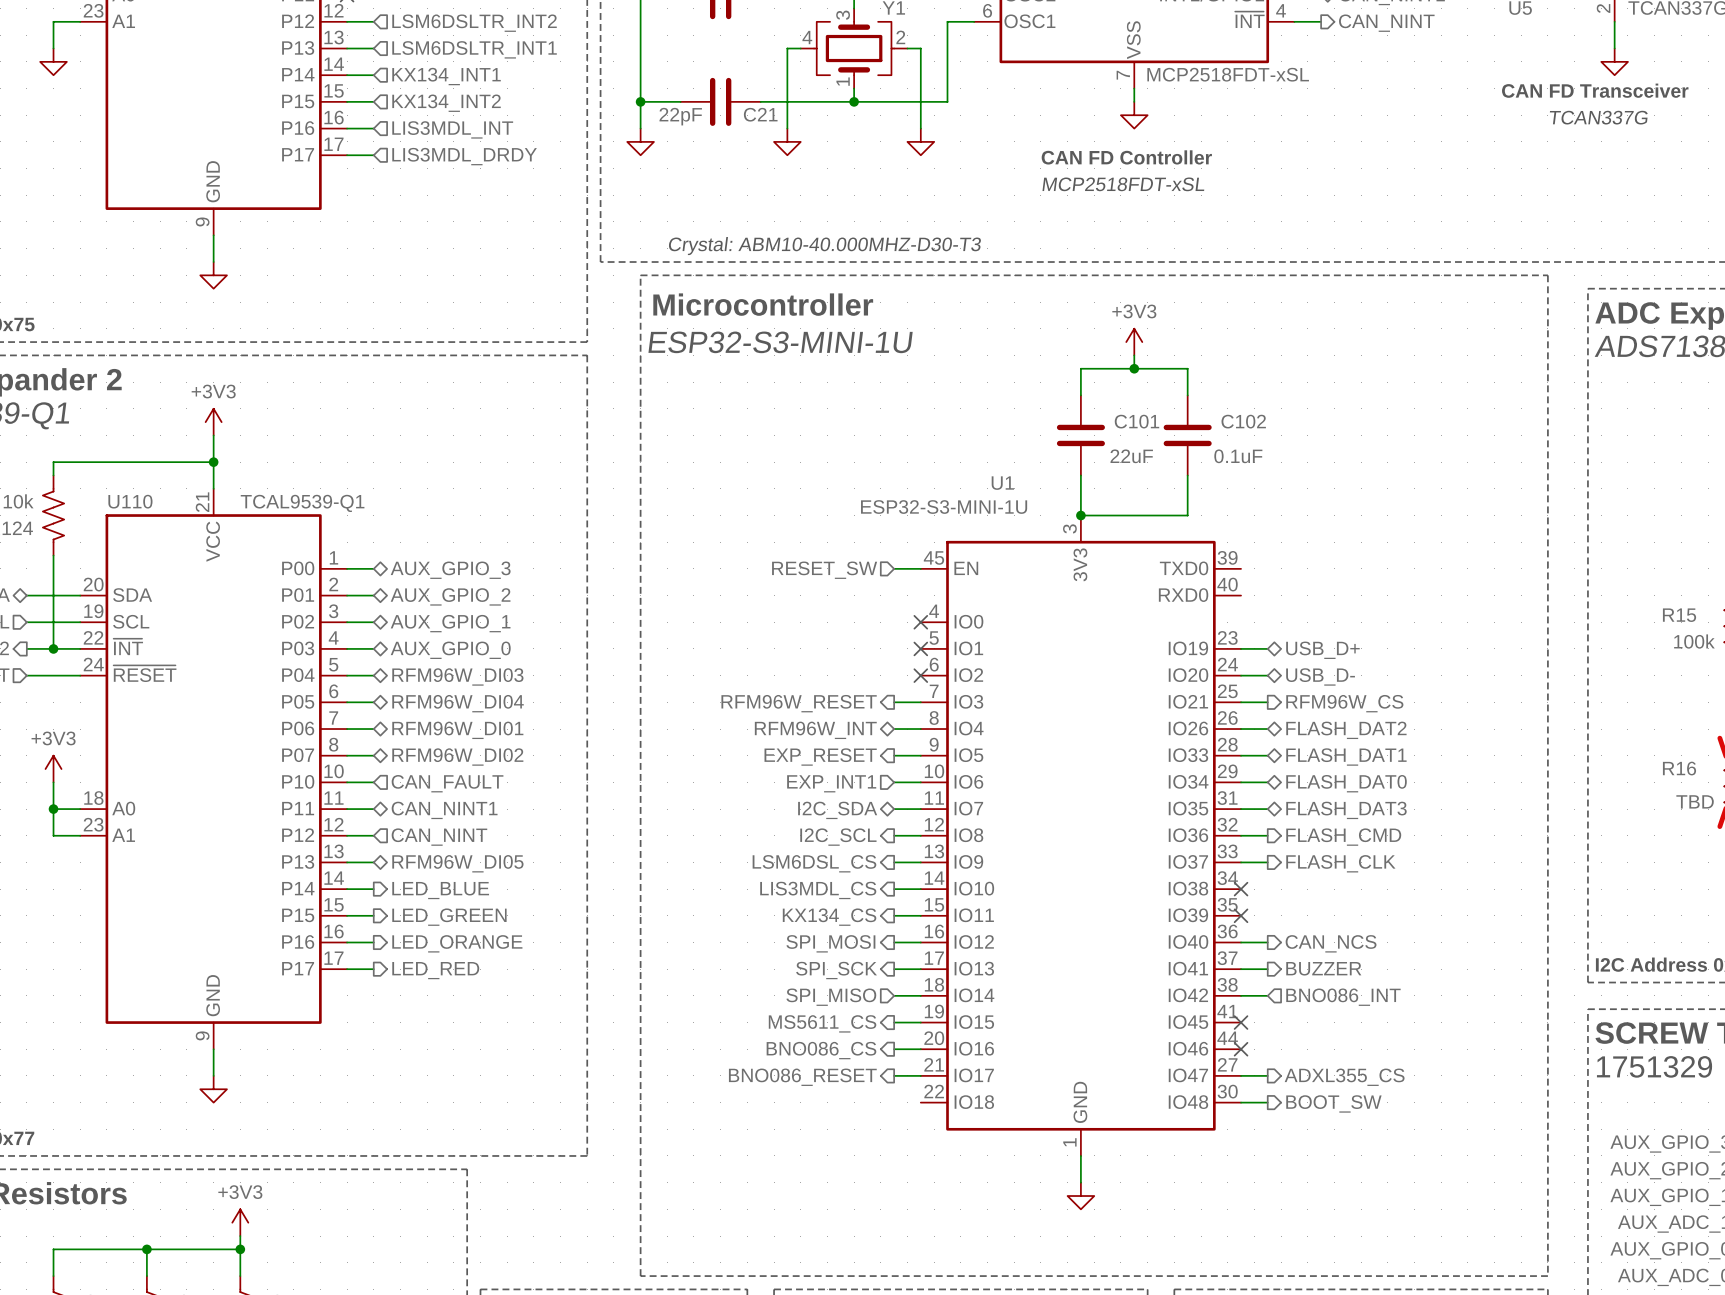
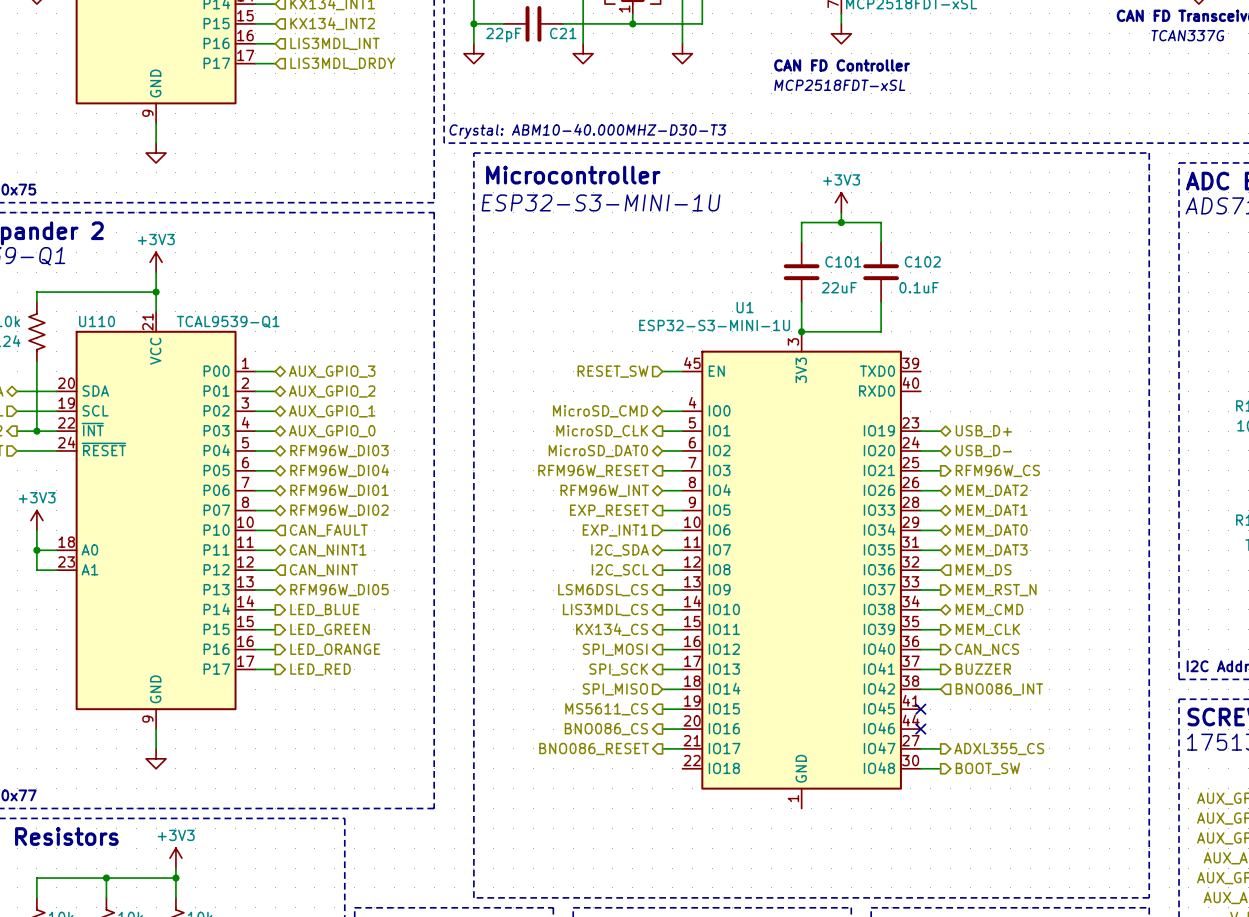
wire: none -> (662, 411) (682, 411)
no-connect mark: (920, 622) -> none
hierarchical label: none -> MicroSD_CMD (600, 411)
wire: none -> (662, 431) (682, 431)
no-connect mark: (920, 648) -> none
hierarchical label: none -> MicroSD_CLK (602, 431)
wire: none -> (662, 450) (682, 450)
no-connect mark: (920, 675) -> none
hierarchical label: none -> MicroSD_DAT0 (598, 451)
hierarchical label: FLASH_DAT2 (1346, 730) -> MEM_DAT2 (991, 490)
hierarchical label: FLASH_DAT1 (1346, 757) -> MEM_DAT1 (991, 510)
hierarchical label: FLASH_DAT0 (1346, 783) -> MEM_DAT0 (991, 530)
hierarchical label: FLASH_DAT3 (1346, 810) -> MEM_DAT3 (991, 550)
hierarchical label shape: output (1343, 837) -> input (983, 570)
hierarchical label: FLASH_CMD (1343, 837) -> MEM_DS (983, 570)
hierarchical label: FLASH_CLK (1340, 863) -> MEM_RST_N (996, 590)
wire: none -> (920, 609) (940, 609)
no-connect mark: (1241, 889) -> none
hierarchical label: none -> MEM_CMD (989, 609)
wire: none -> (920, 629) (940, 629)
no-connect mark: (1241, 915) -> none
hierarchical label: none -> MEM_CLK (987, 629)
wire: (1080, 1155) (1080, 1182) -> none
power symbol: (1080, 1196) -> none

